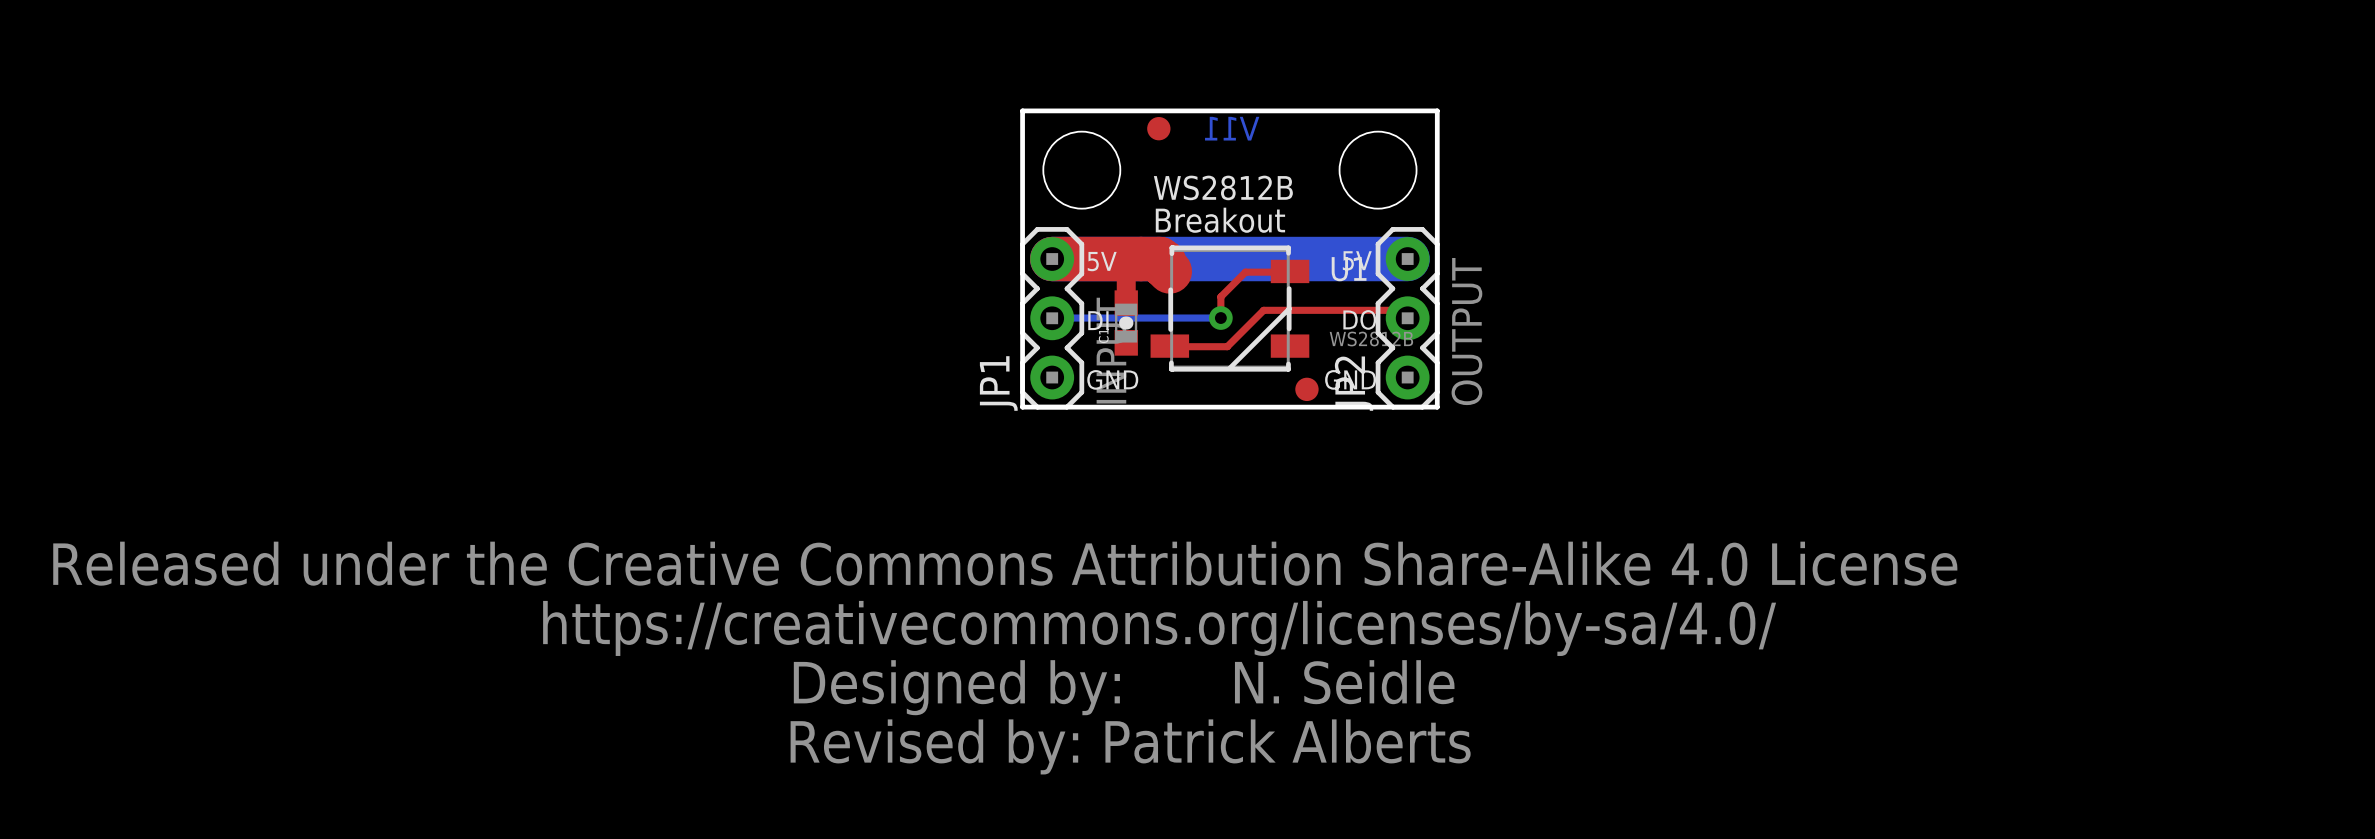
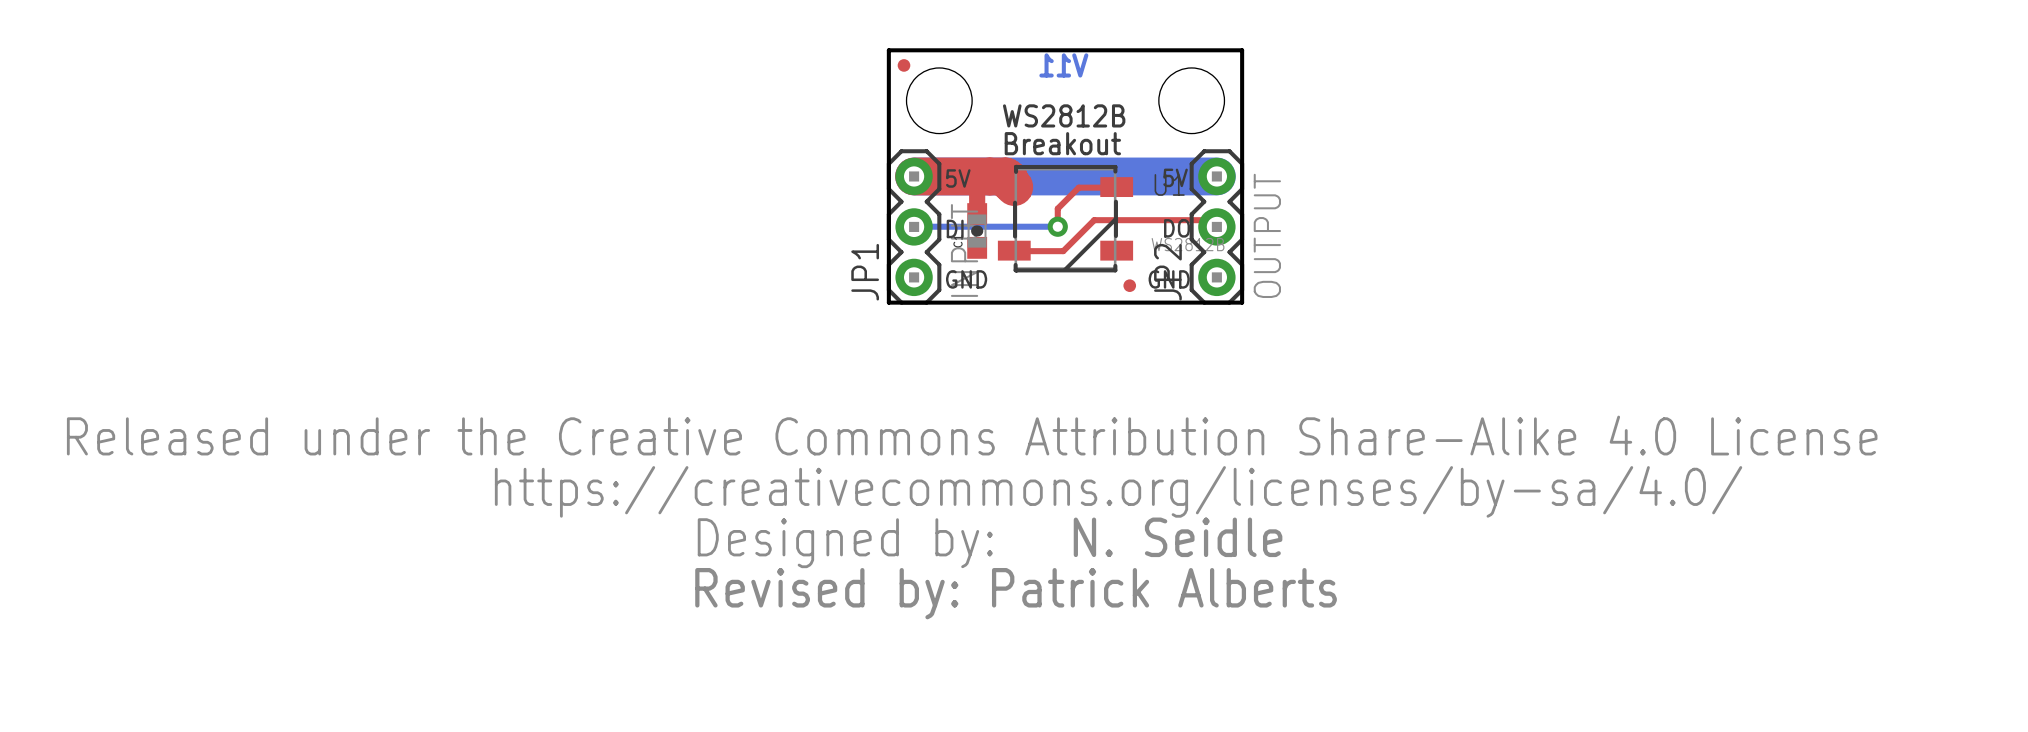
part: none -> (903, 65)
part: (1158, 128) -> none
part footprint: [1295, 377, 1319, 402] -> [1123, 279, 1137, 292]

